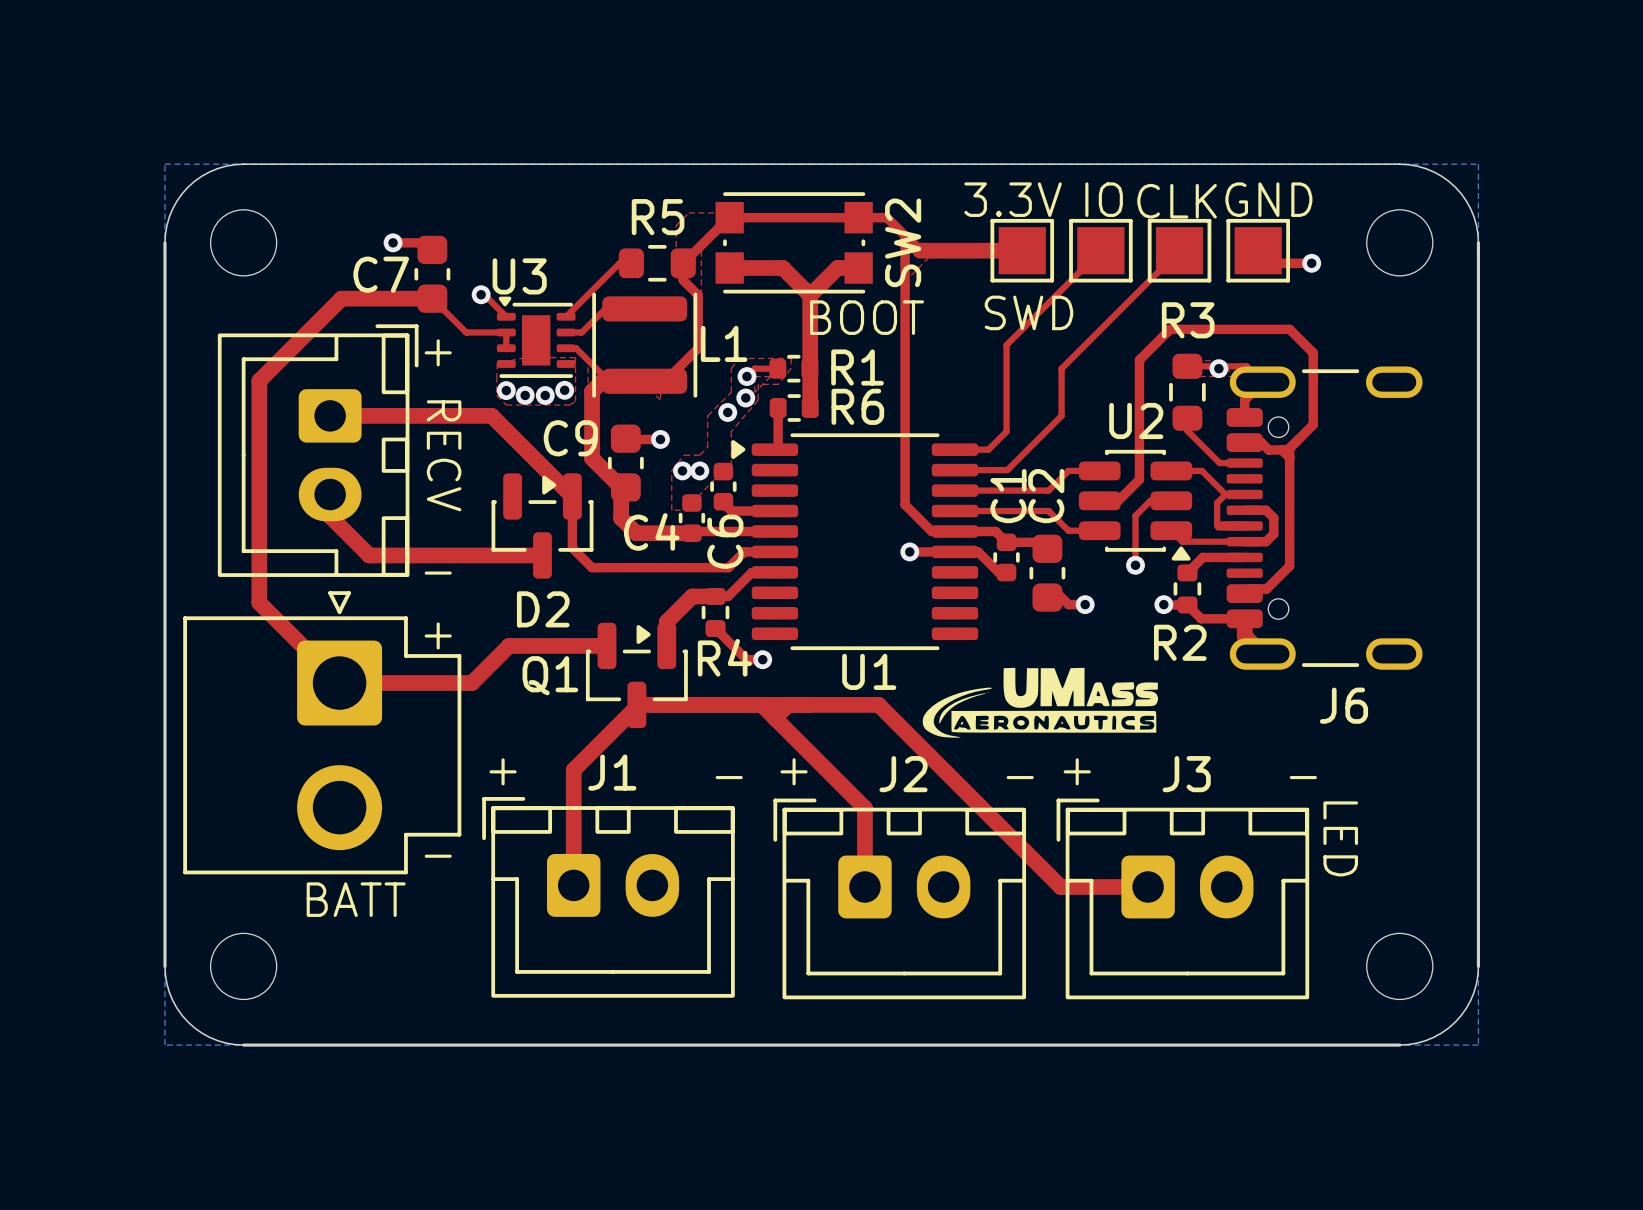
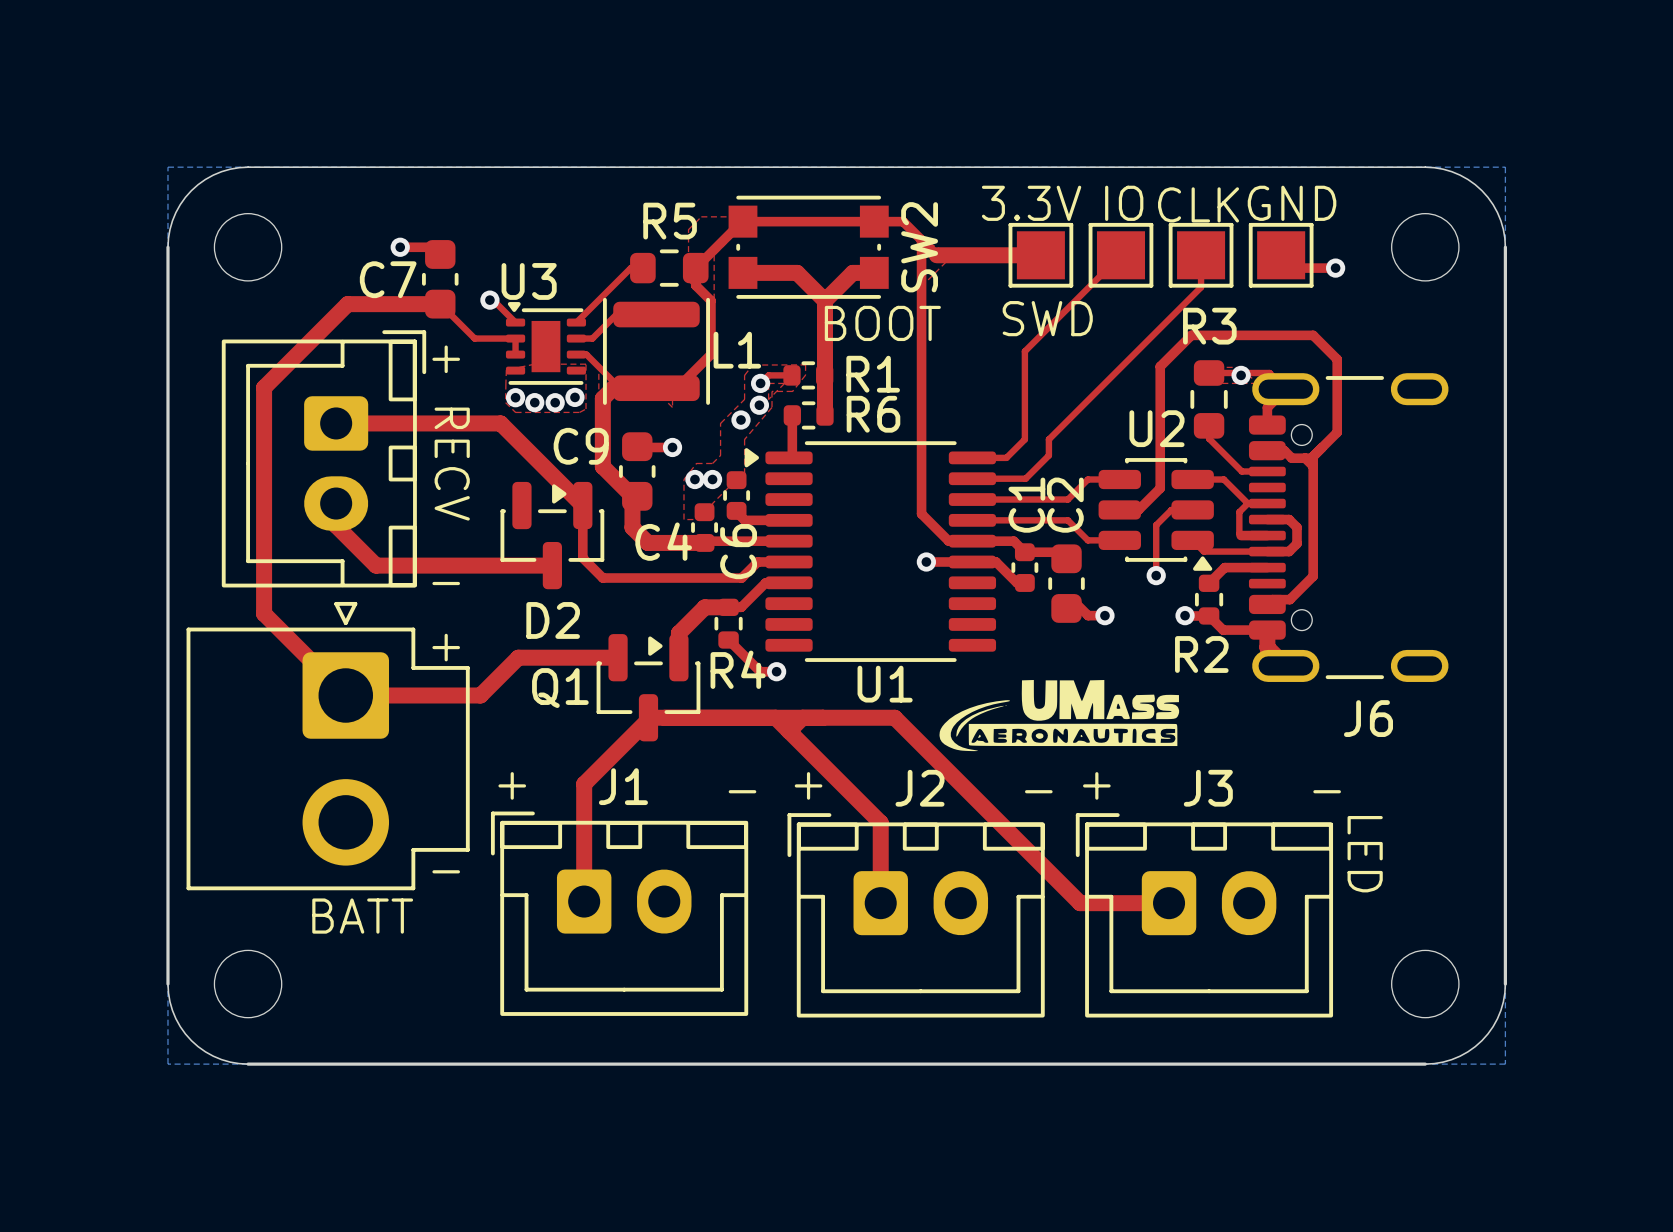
top track: (1179, 250) (1061, 368) (1061, 415) (1030, 447) -> (1201, 255) (1201, 287) (1048, 439) (1048, 455)

